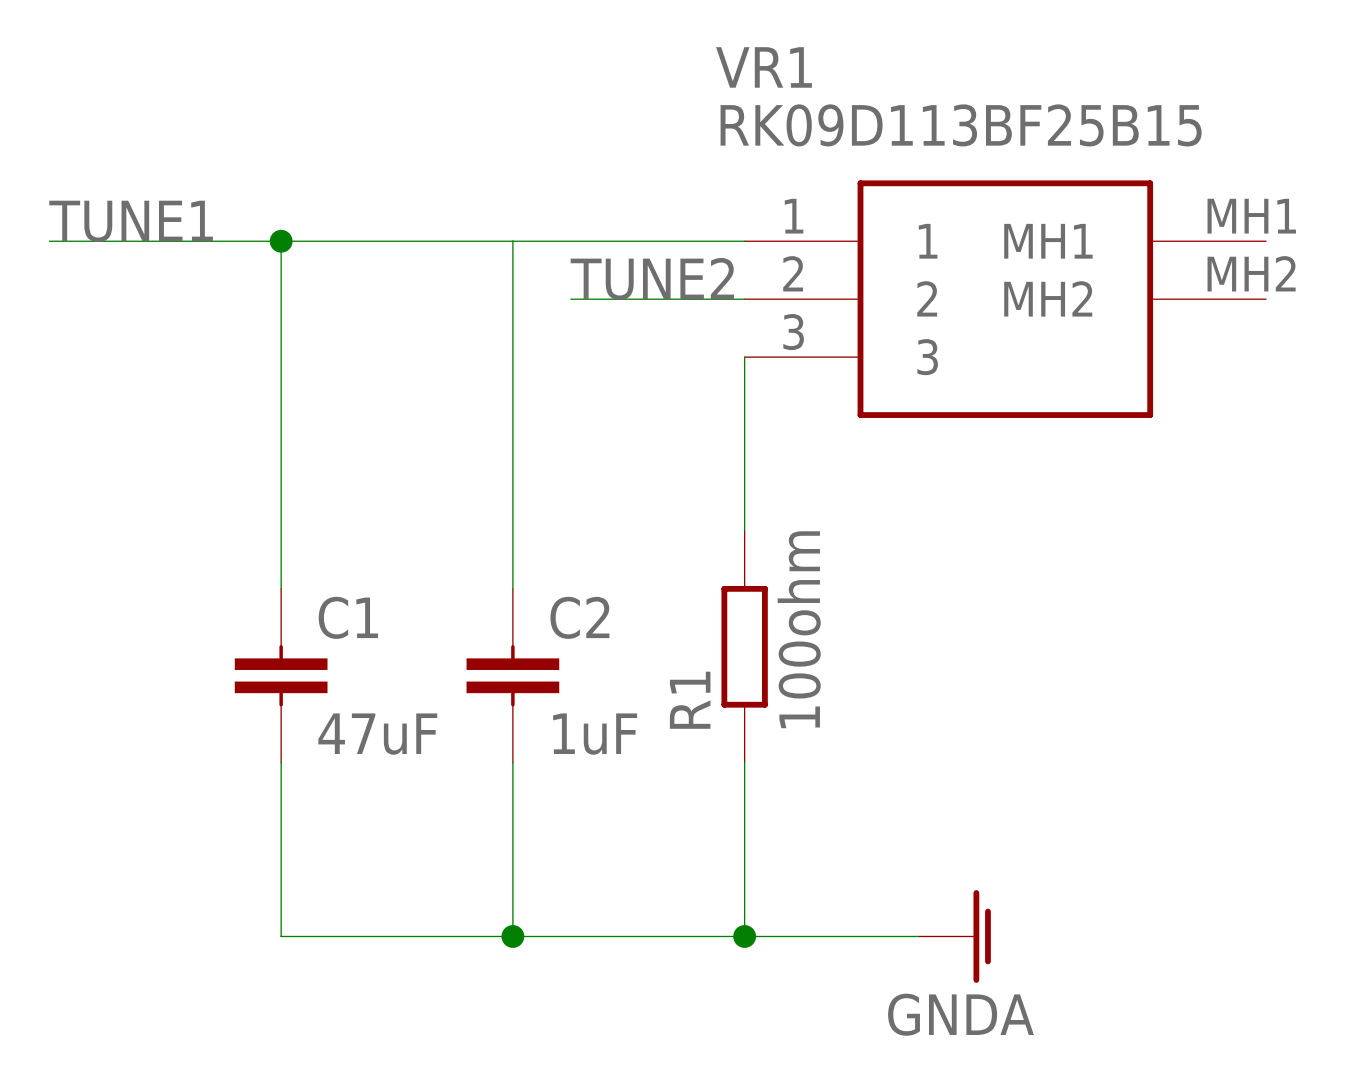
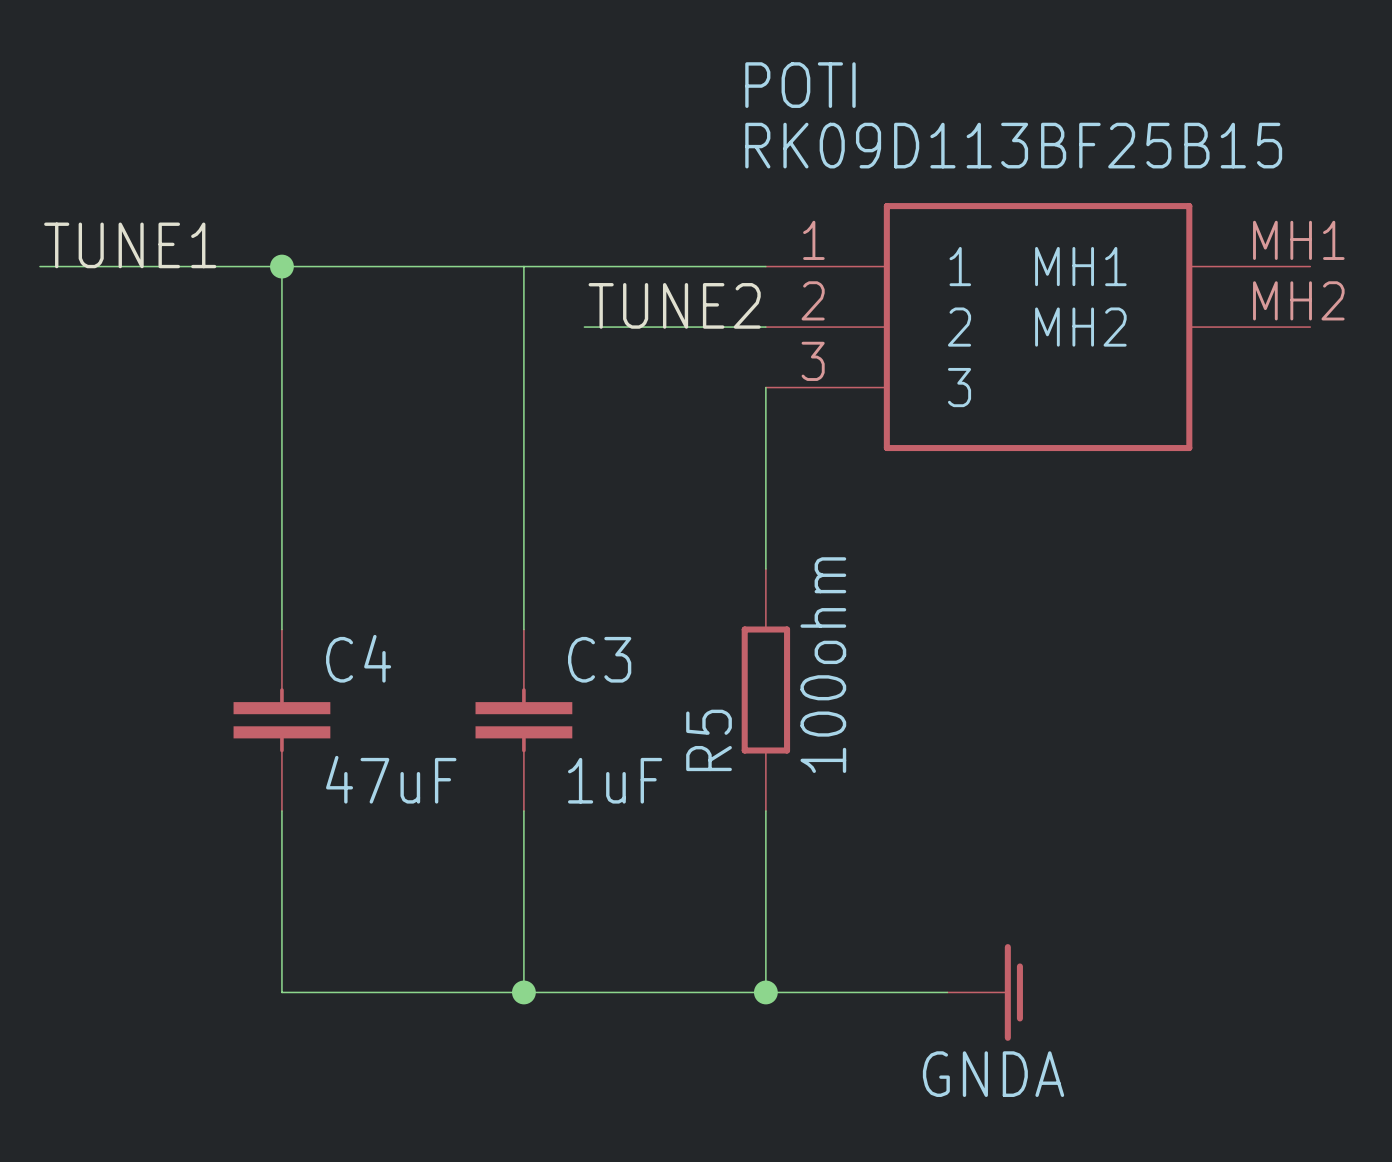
VR1 name: VR1 (763, 67) -> POTI (800, 85)
C1 name: C1 (348, 617) -> C4 (358, 658)
C2 name: C2 (579, 617) -> C3 (599, 659)
R1 name: R1 (690, 700) -> R5 (709, 740)

